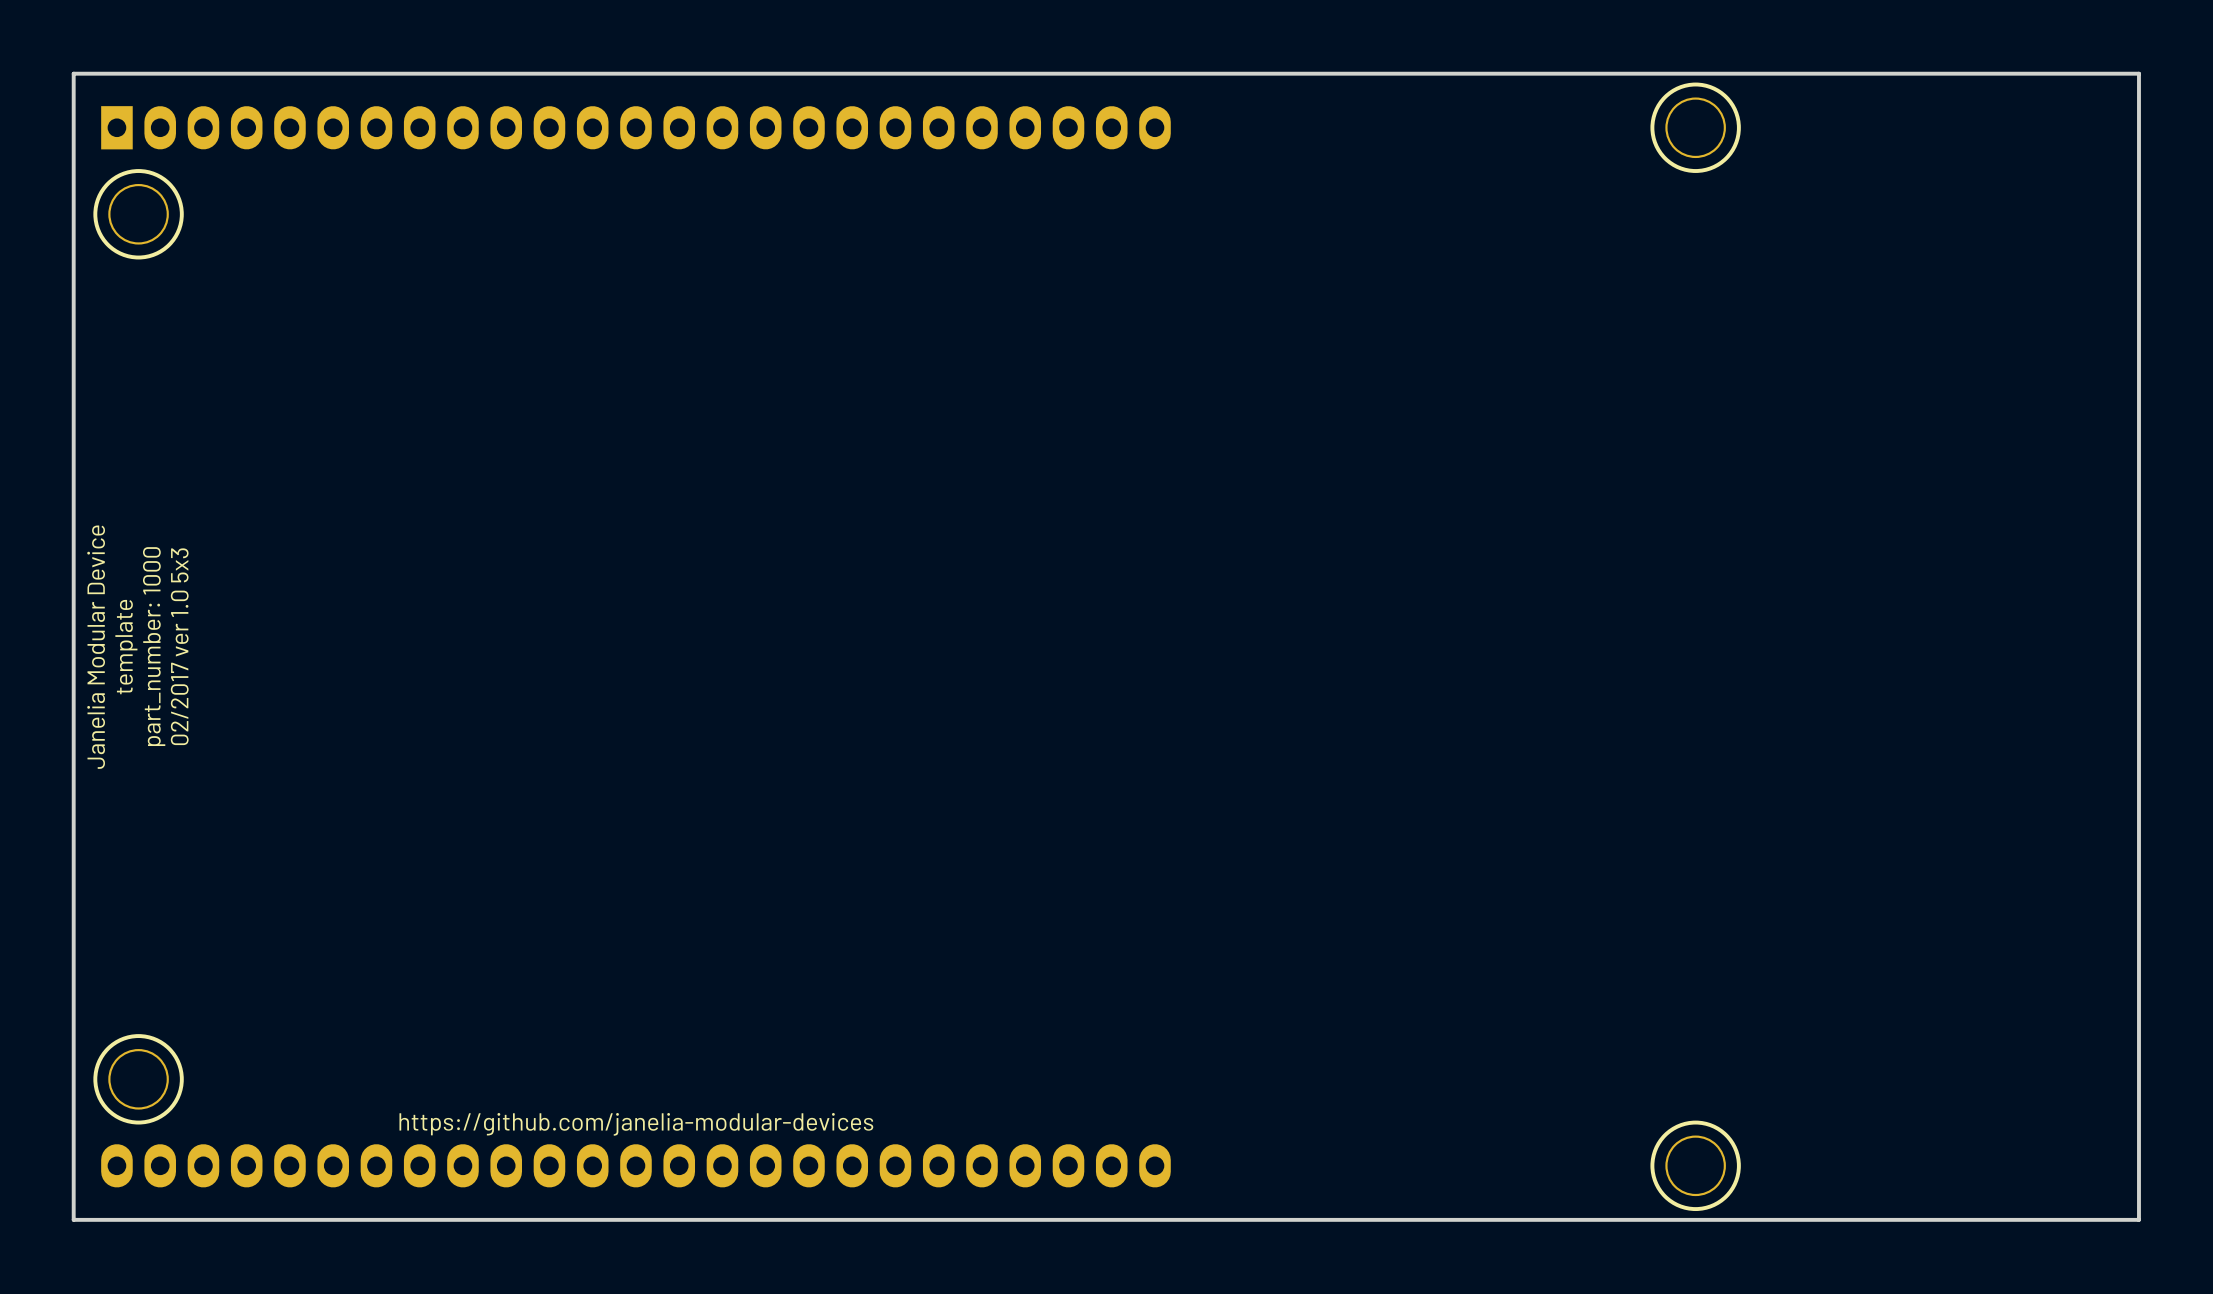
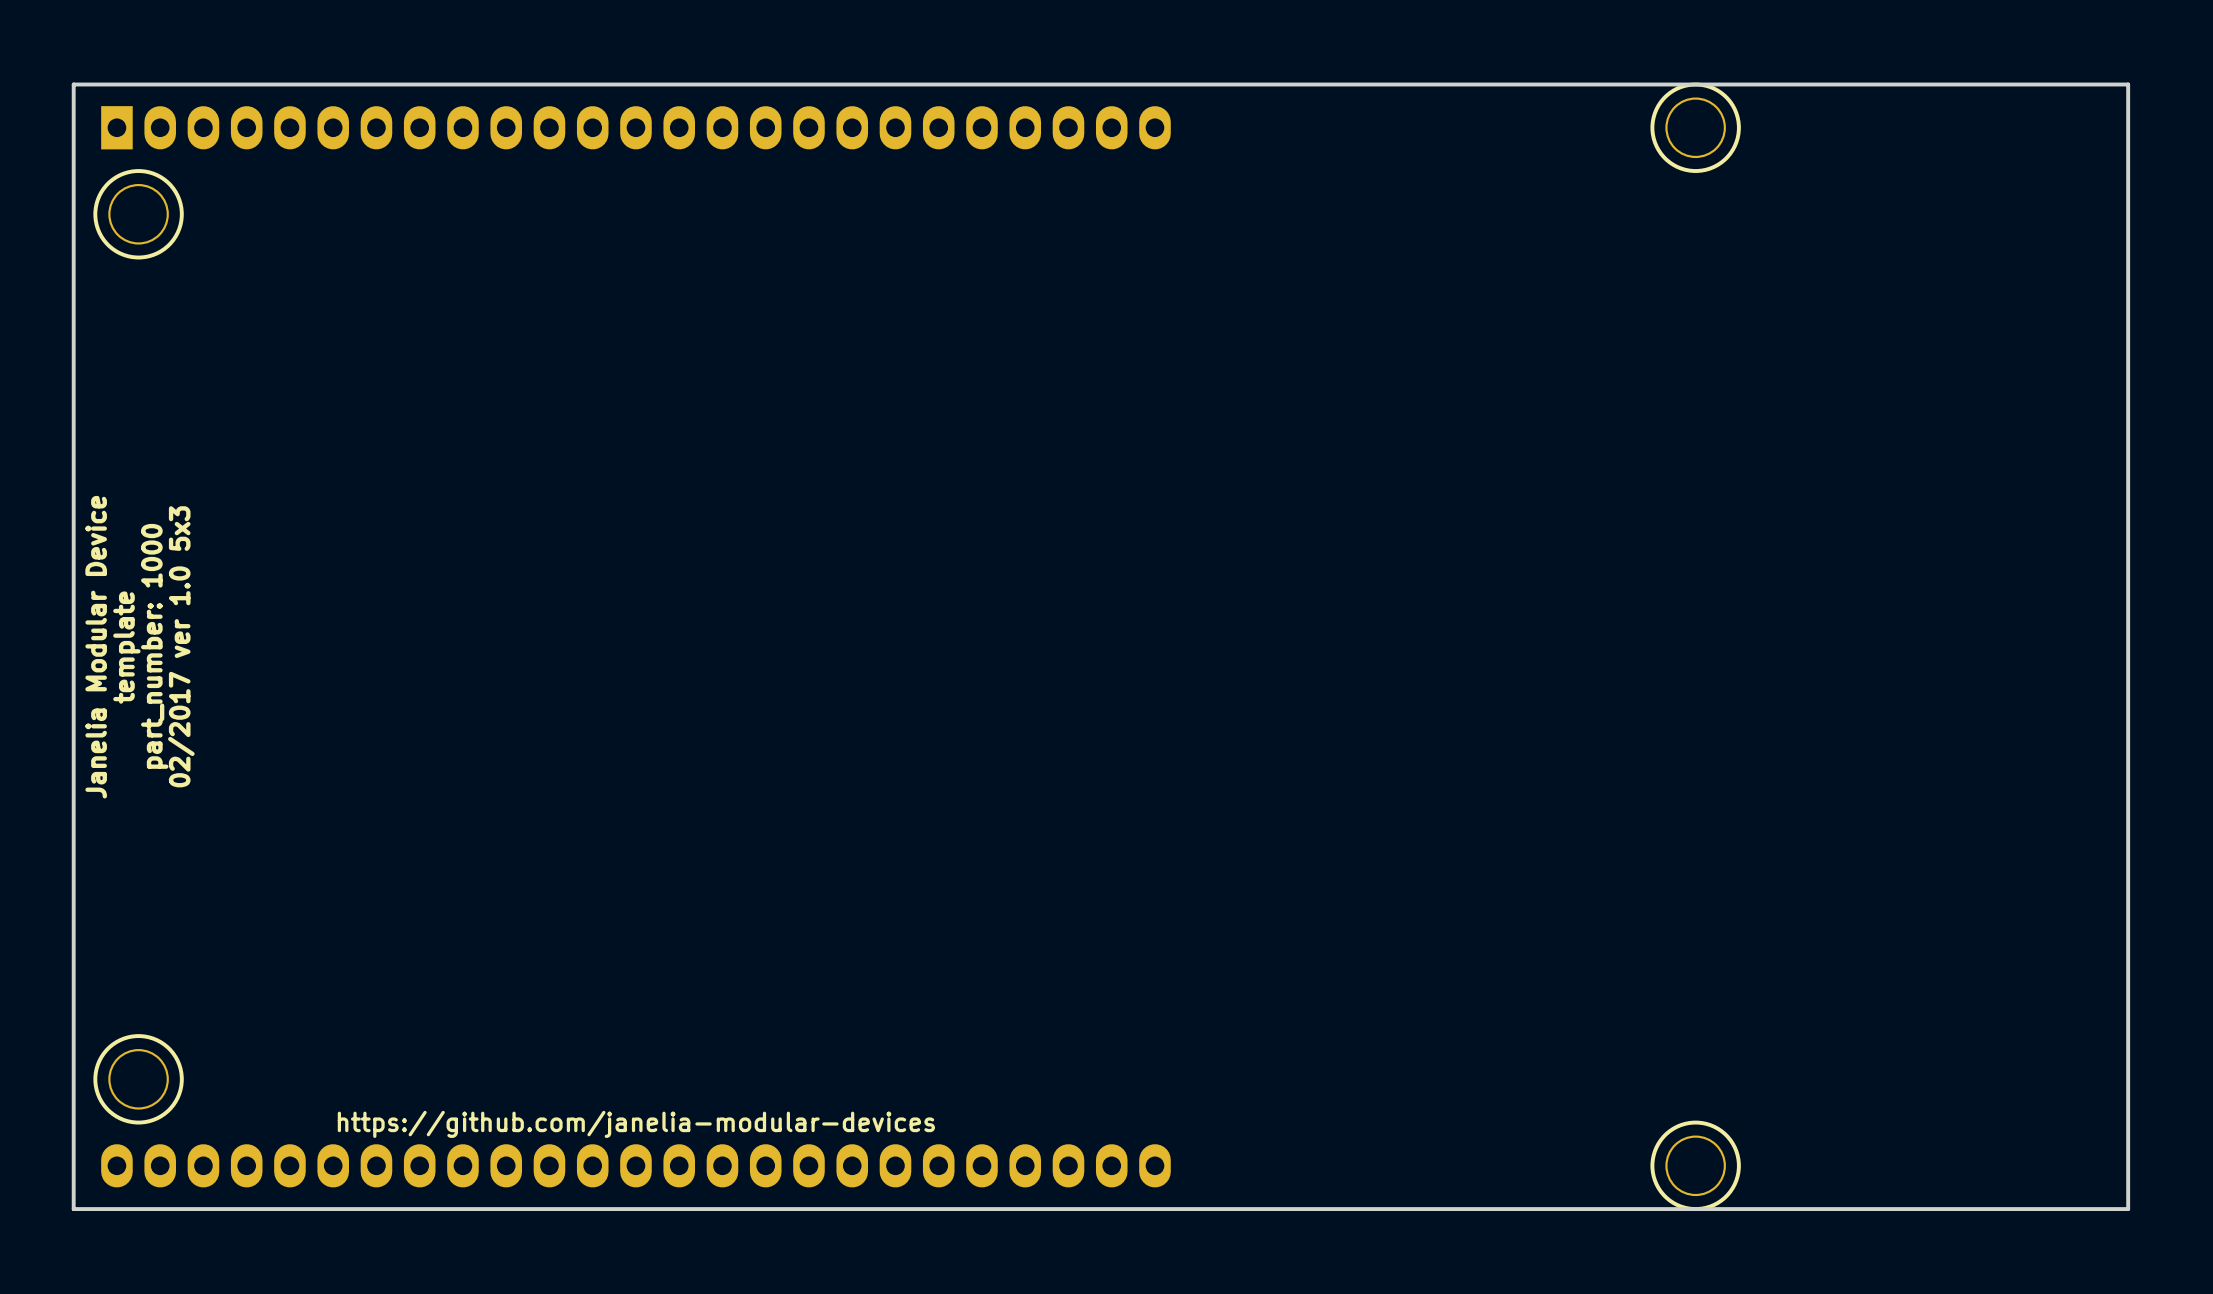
board edge: (73, 84) (73, 73) (2138, 73) (2138, 1219) (73, 1219) (73, 1209) -> (73, 84) (2128, 84) (2128, 1209) (73, 1209)

